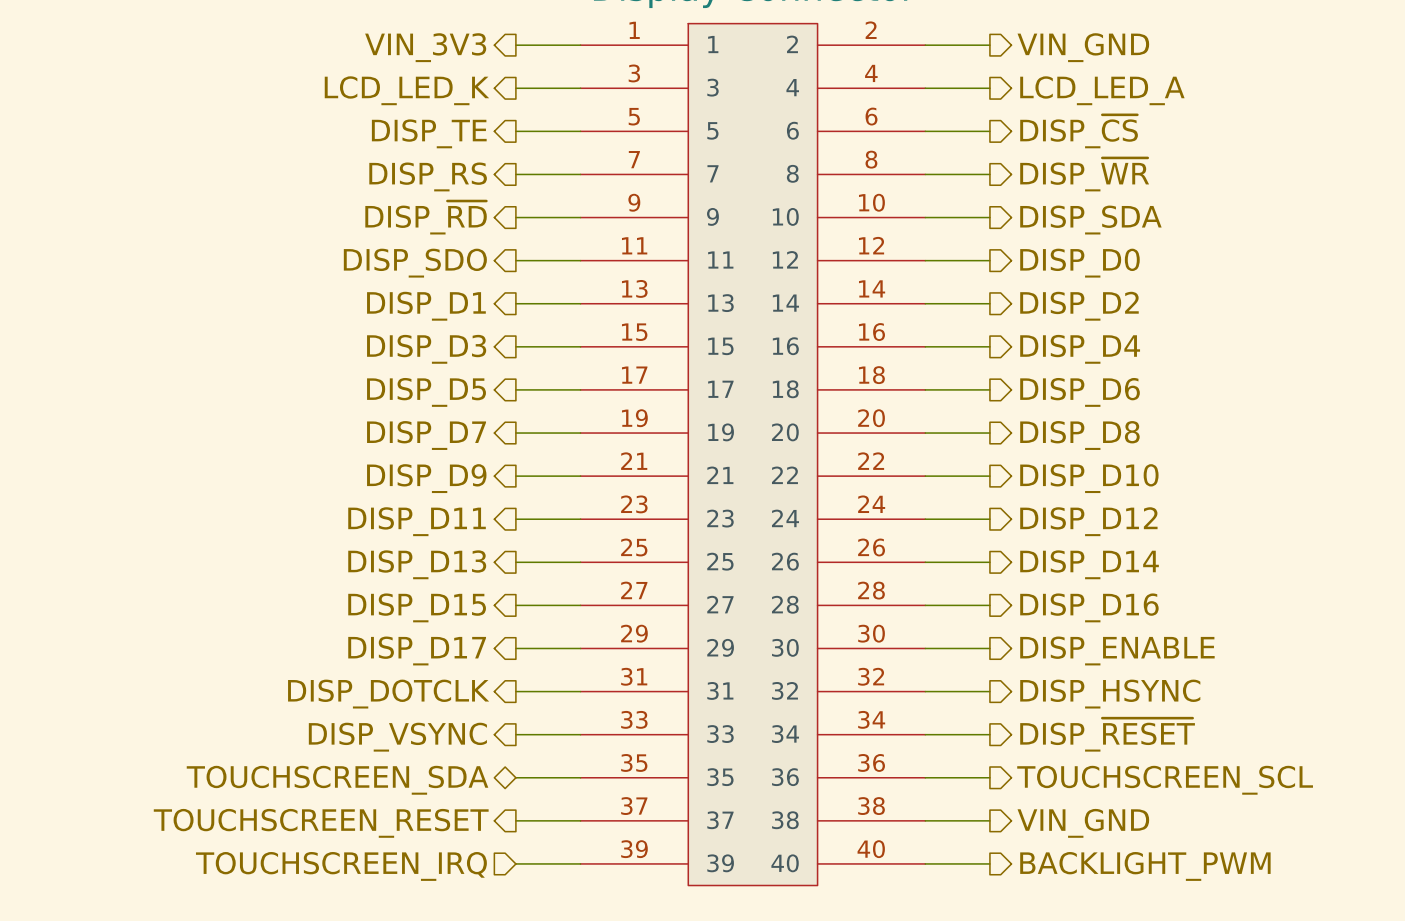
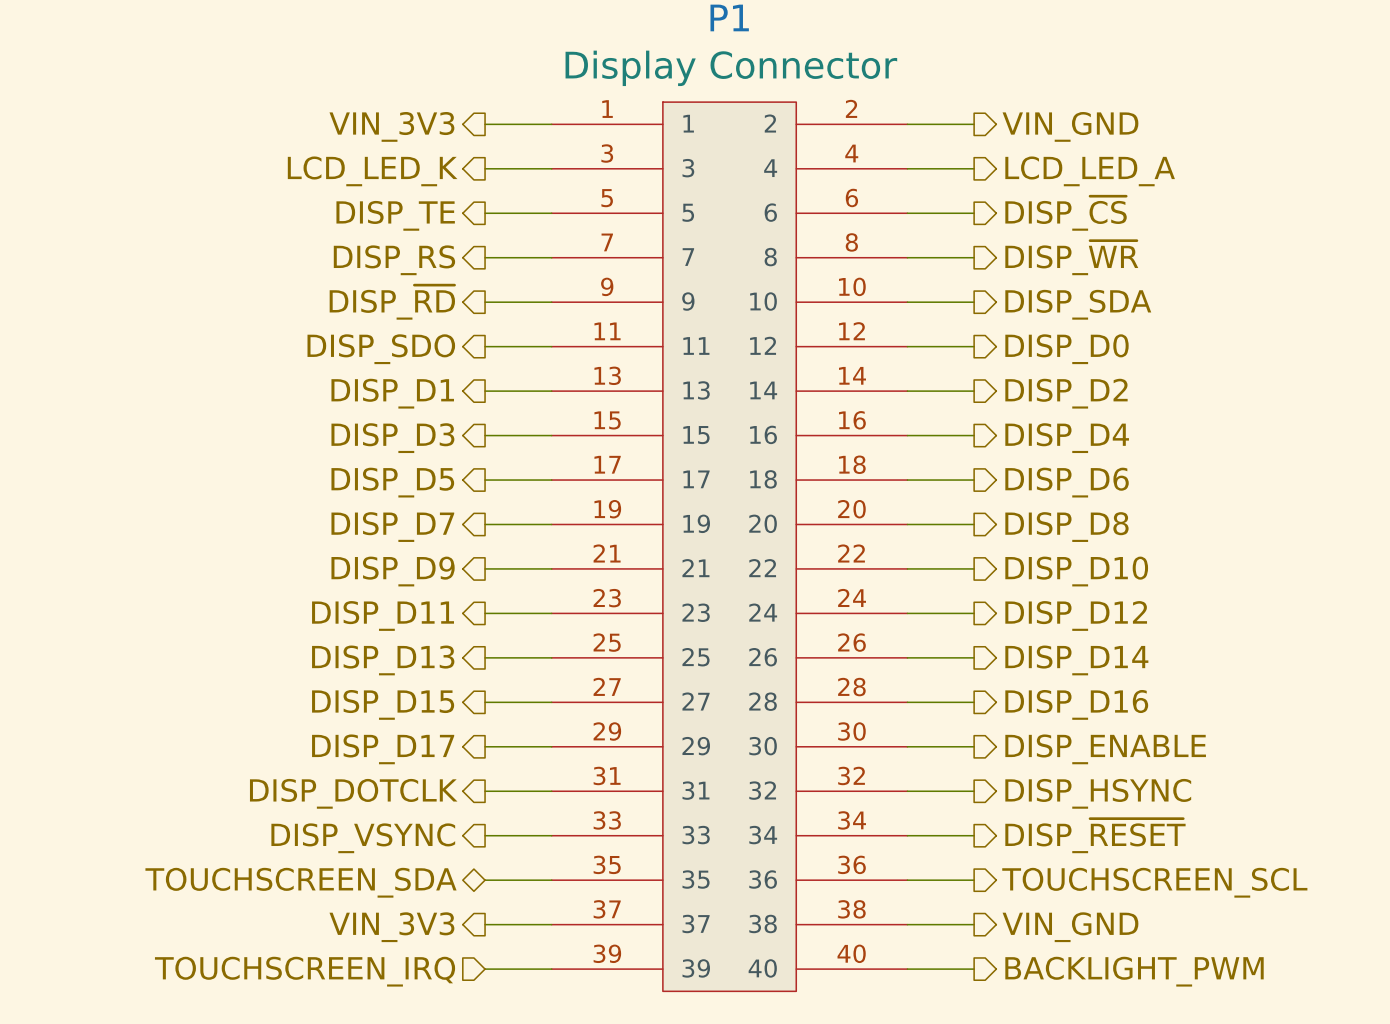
hierarchical label: TOUCHSCREEN_RESET (321, 823) -> VIN_3V3 (391, 927)

